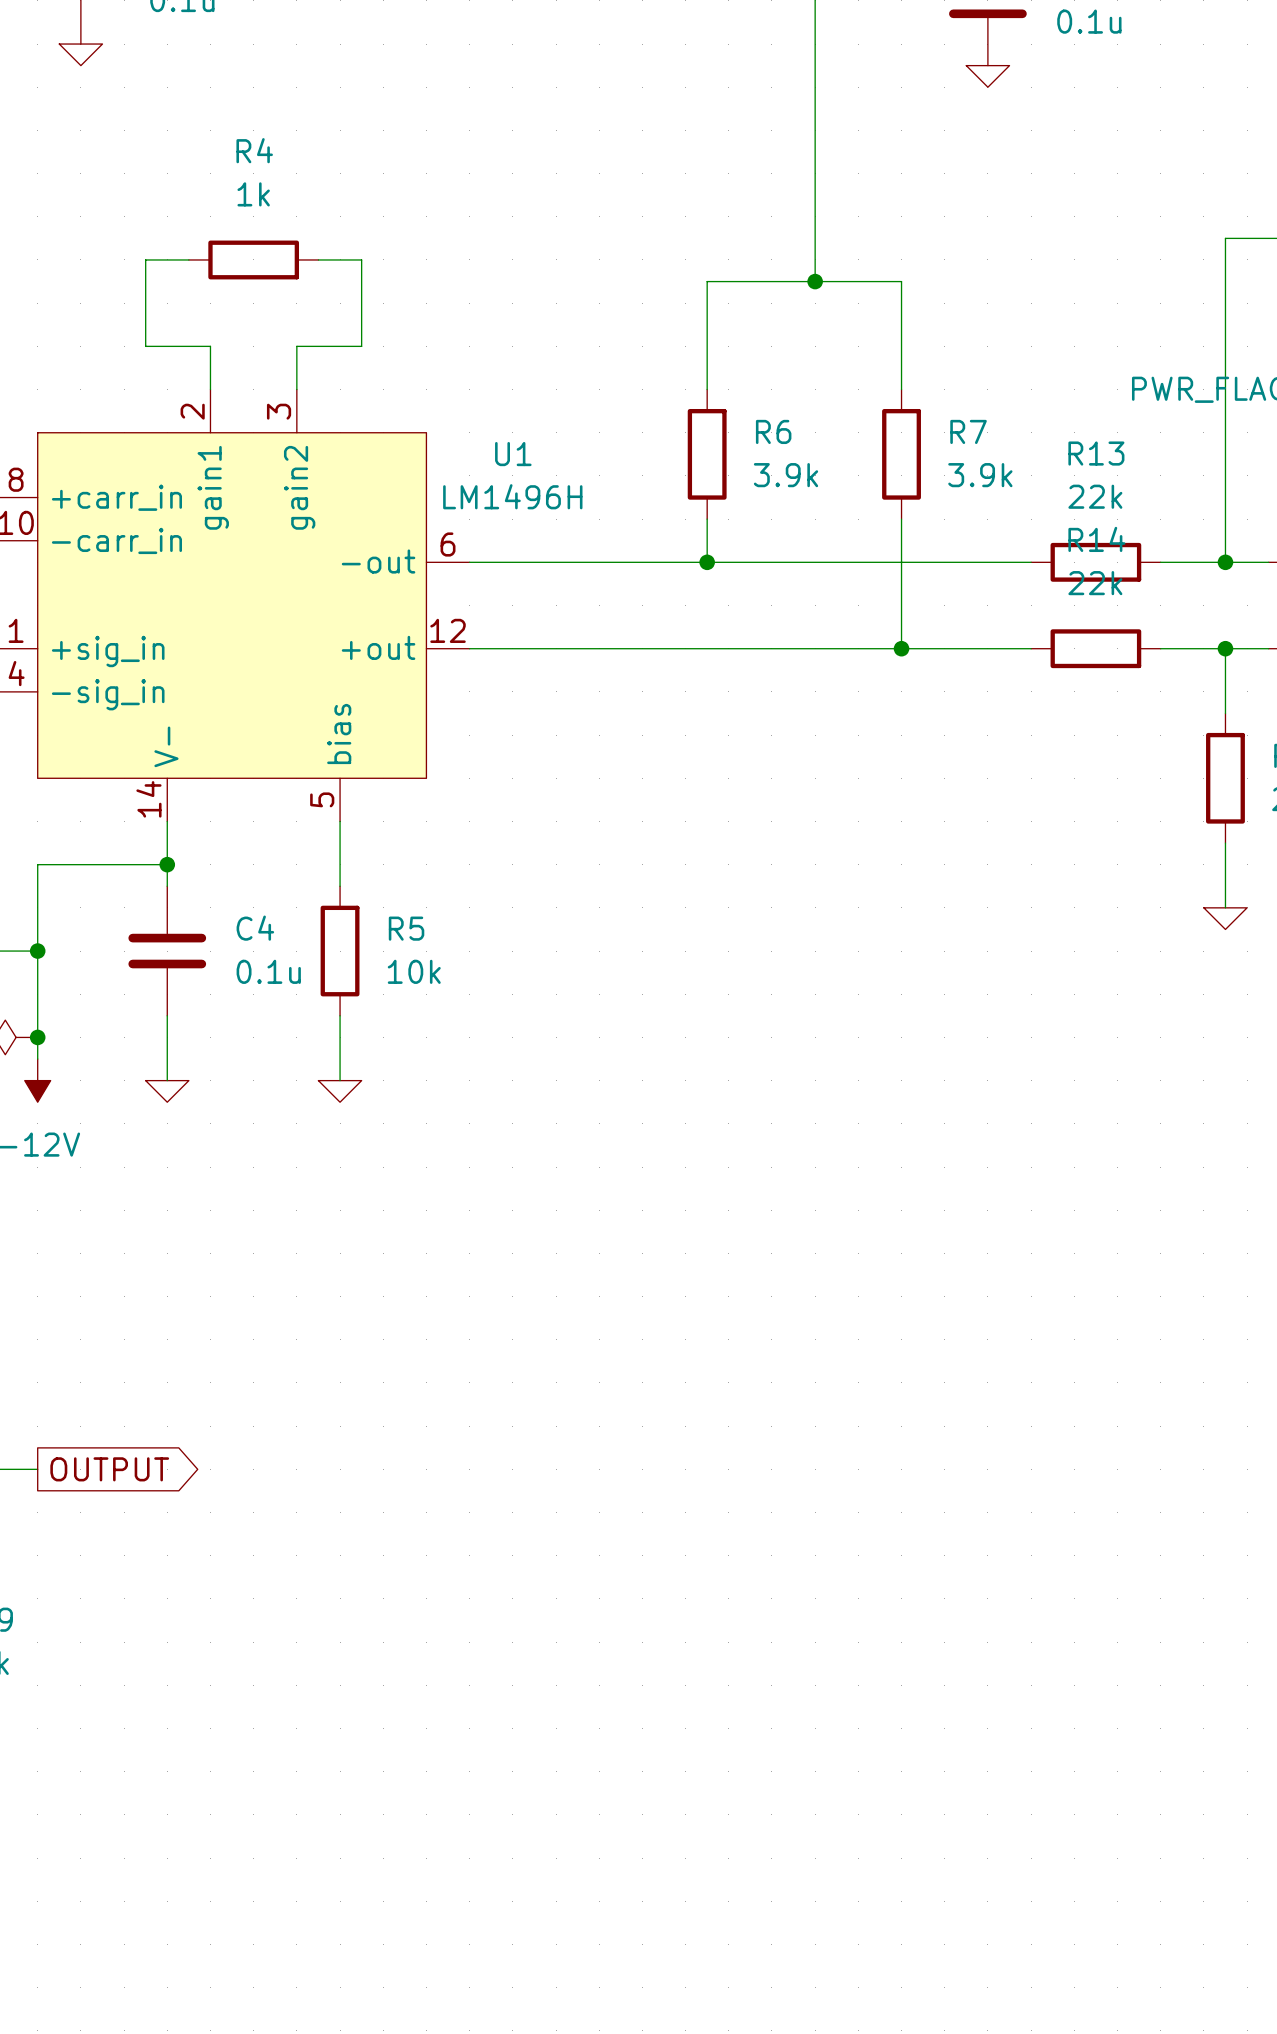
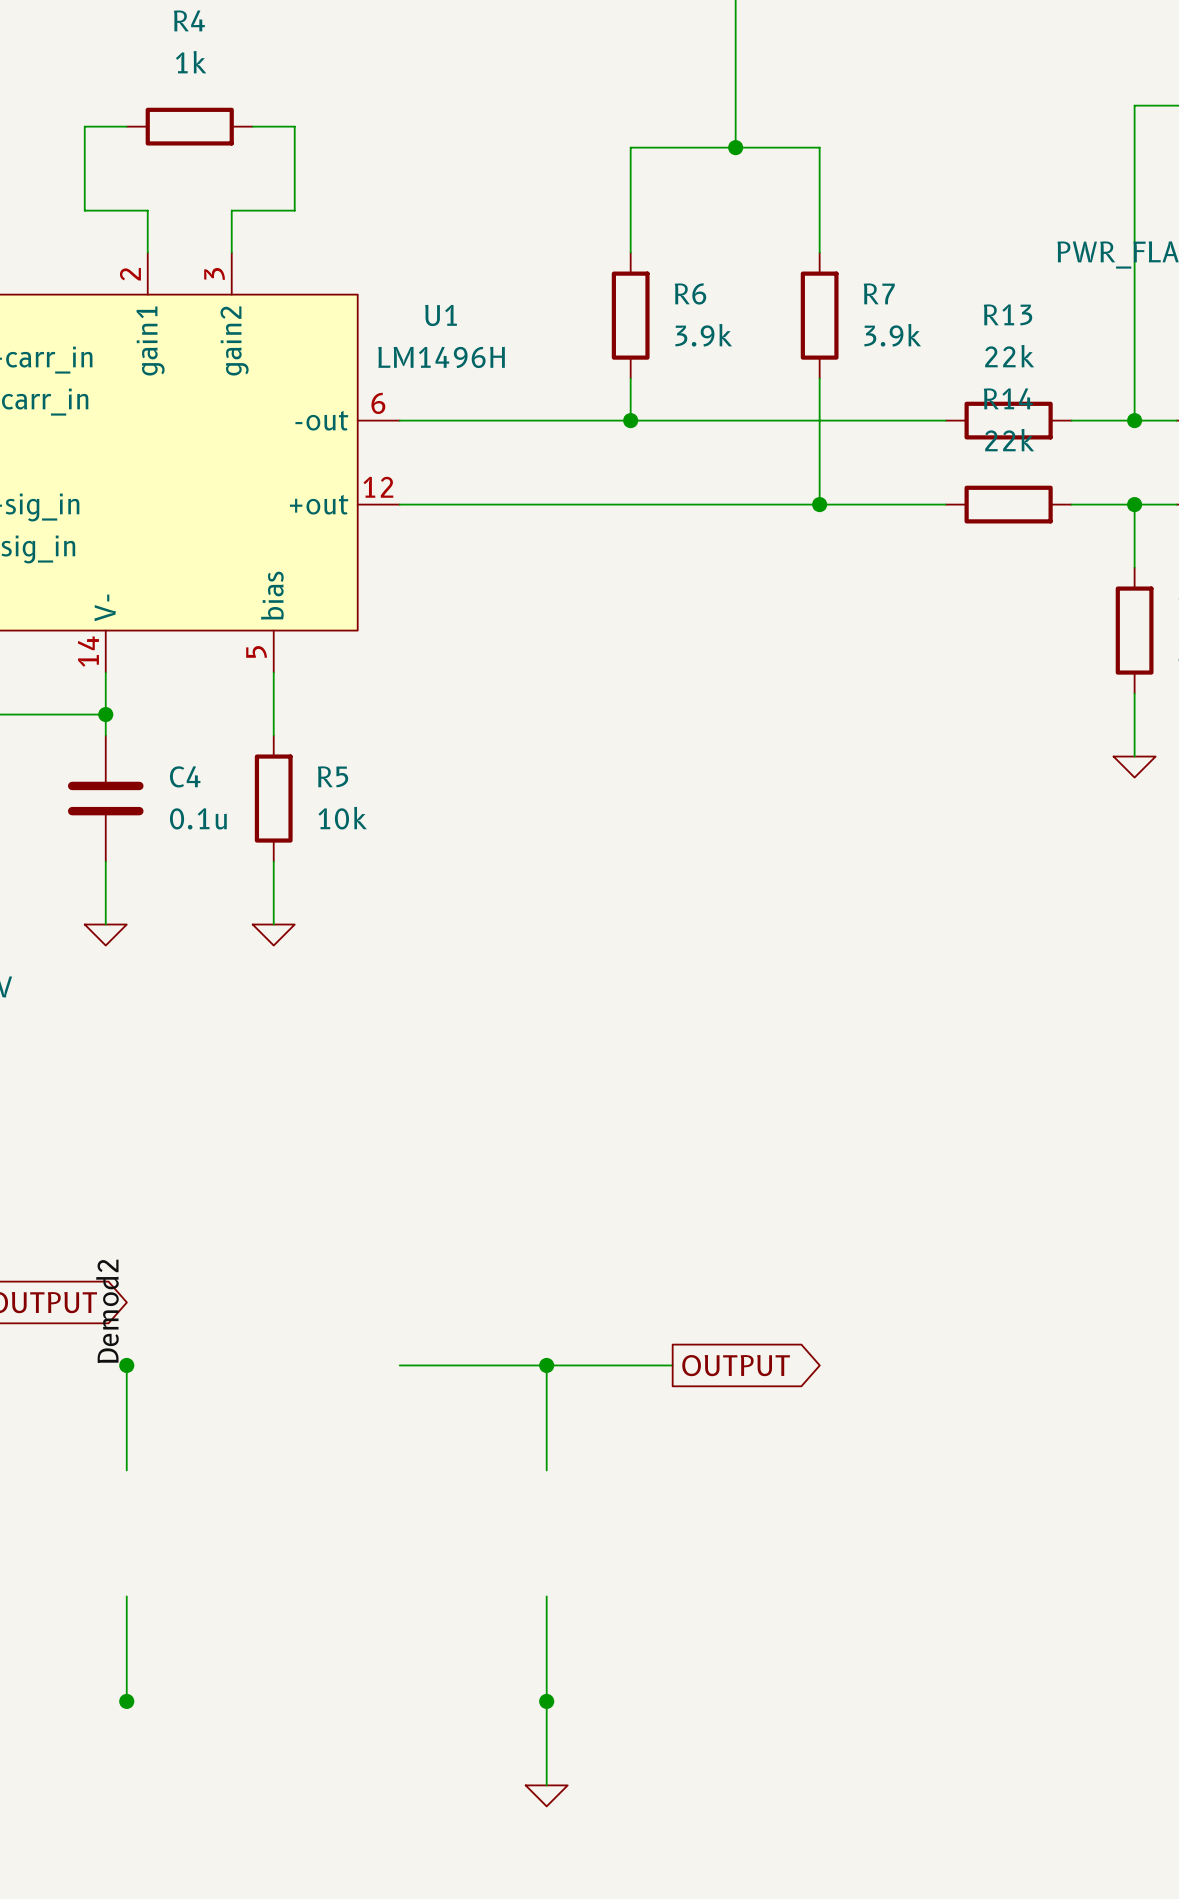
label: none -> Demod2 (107, 1311)
wire: none -> (126, 1365) (126, 1470)
junction: none -> (126, 1365)
wire: none -> (399, 1365) (672, 1365)
wire: none -> (546, 1365) (546, 1470)
junction: none -> (546, 1365)
global label: none -> OUTPUT (736, 1365)
wire: none -> (126, 1596) (126, 1701)
wire: none -> (546, 1596) (546, 1785)
junction: none -> (126, 1701)
junction: none -> (546, 1701)
power symbol: none -> (546, 1795)

